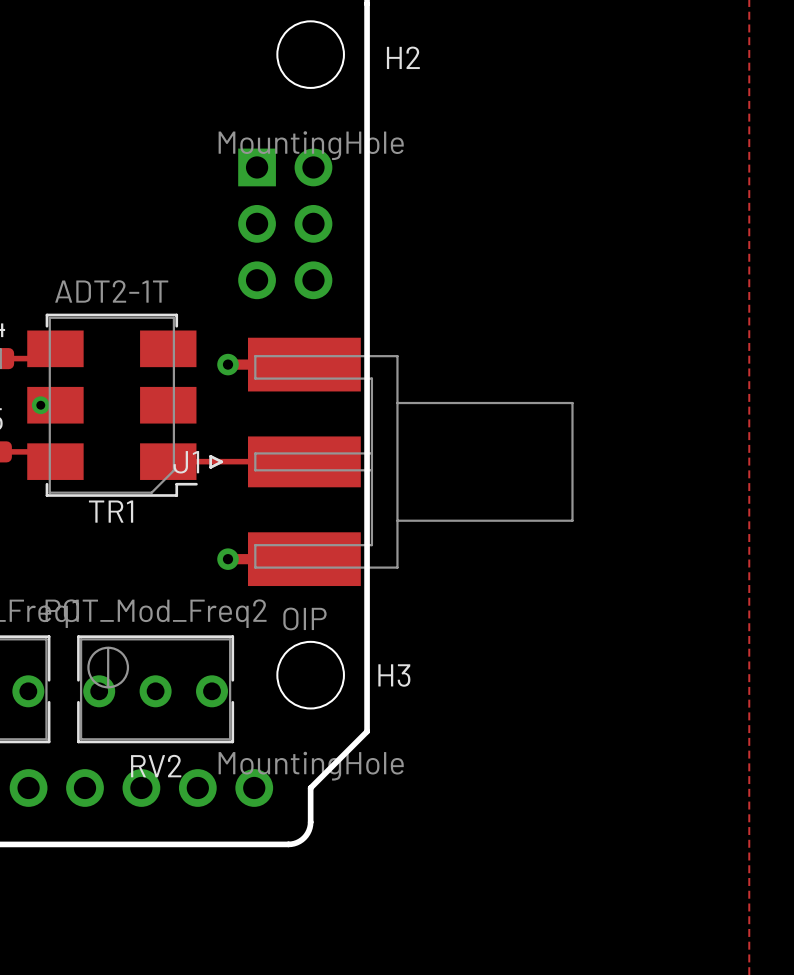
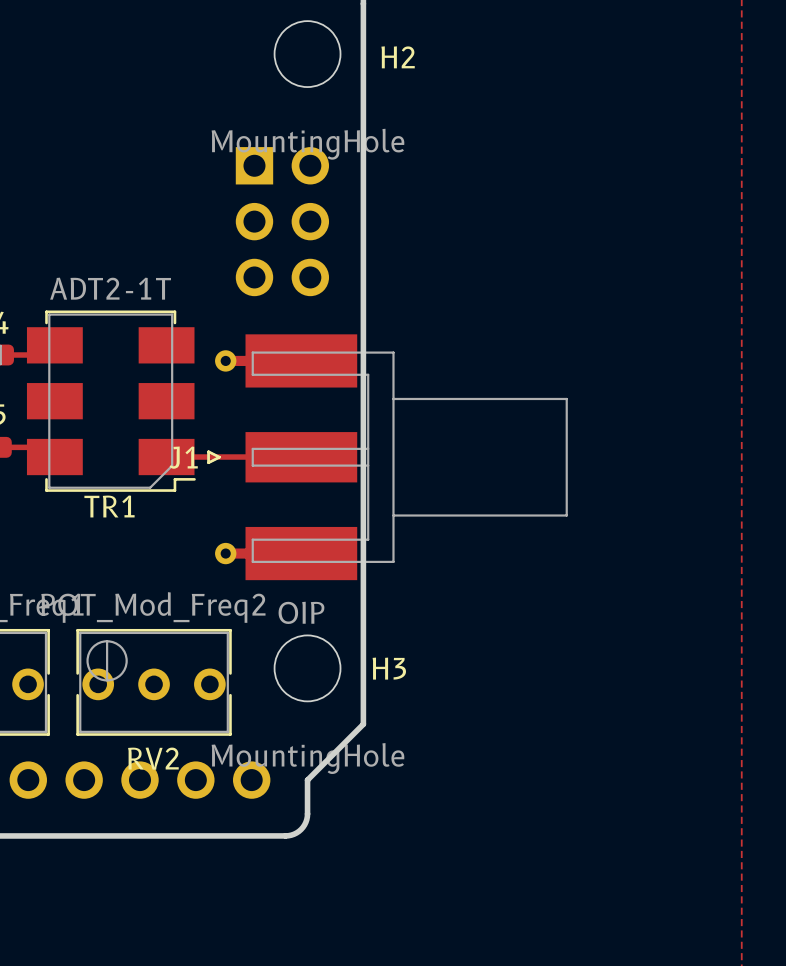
via: (40, 405) -> none

